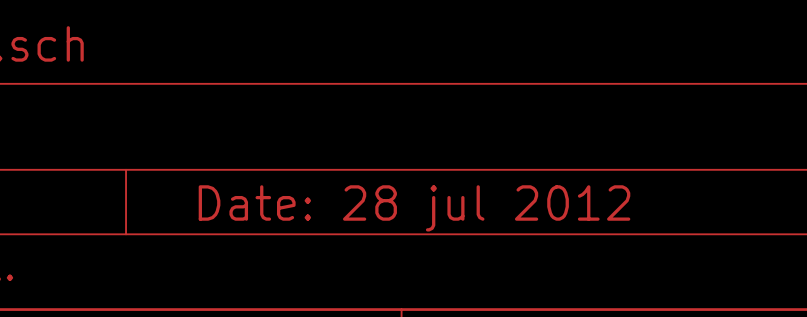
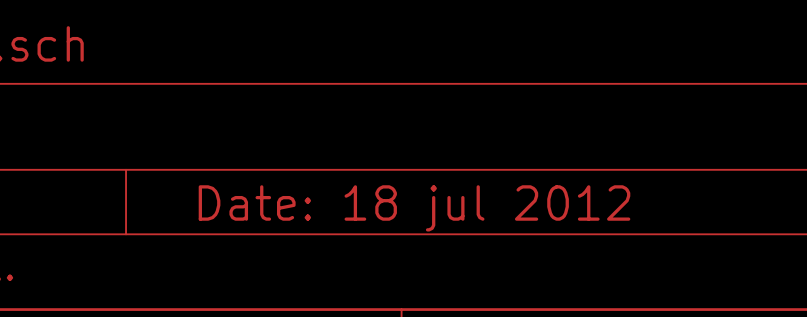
title block: Date: 28 jul 2012 (414, 208) -> Date: 18 jul 2012 (414, 208)

